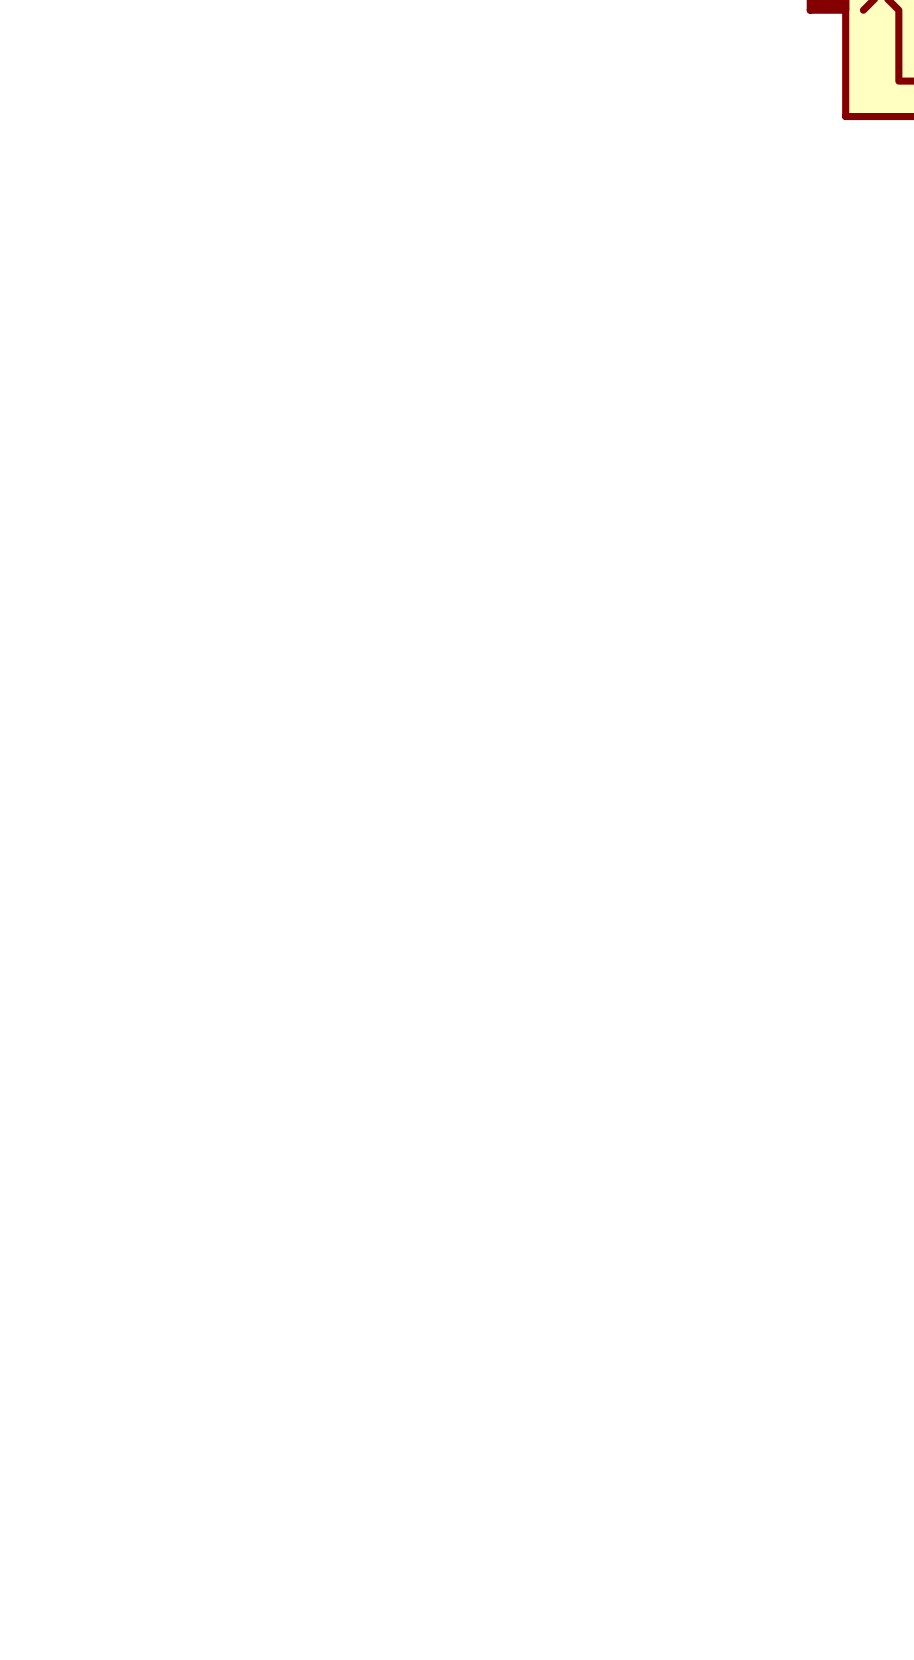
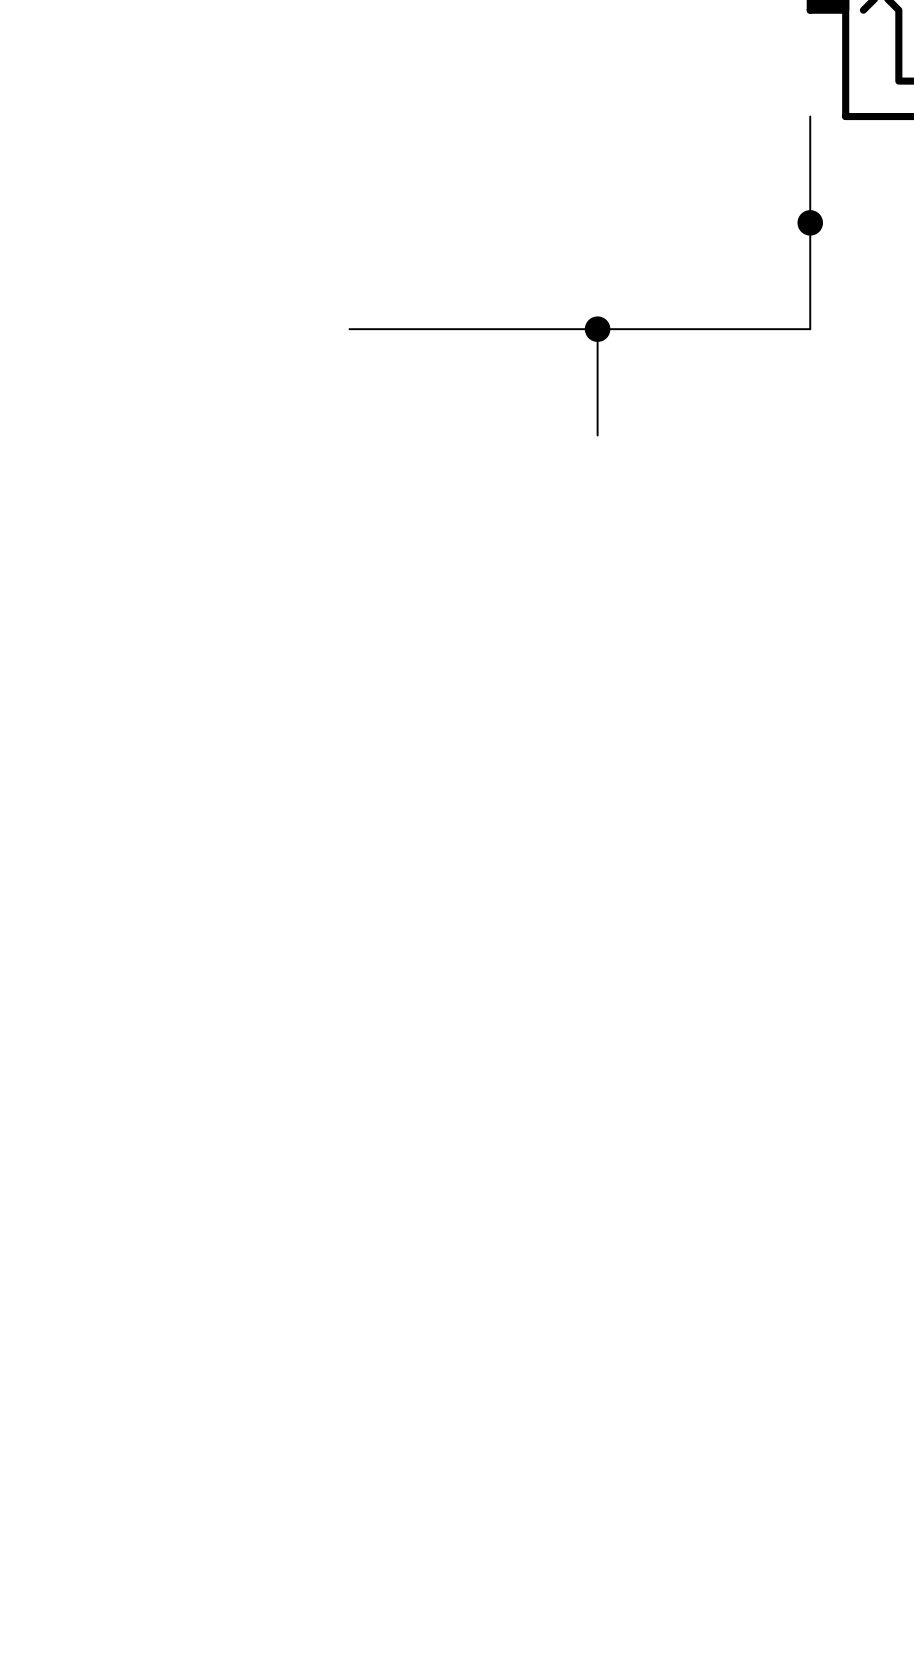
wire: none -> (810, 116) (810, 329) (349, 329)
junction: none -> (810, 222)
wire: none -> (597, 329) (597, 435)
junction: none -> (597, 329)

